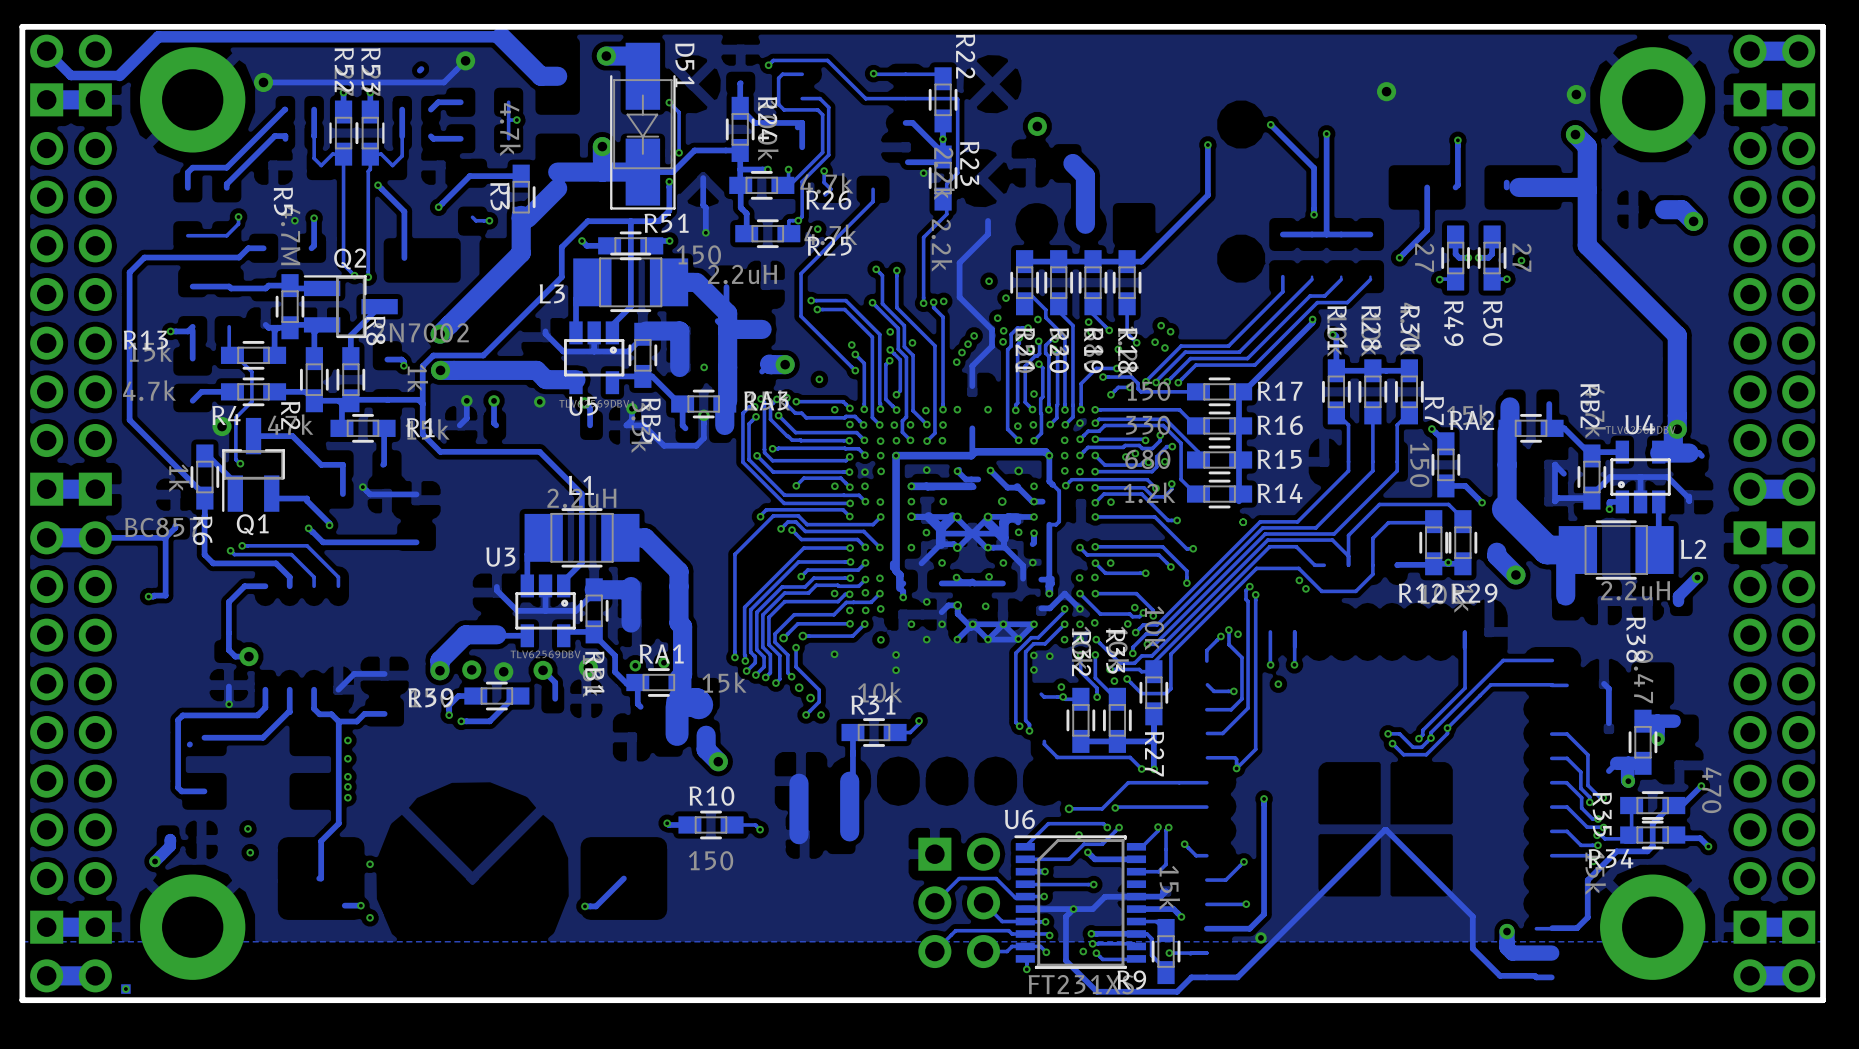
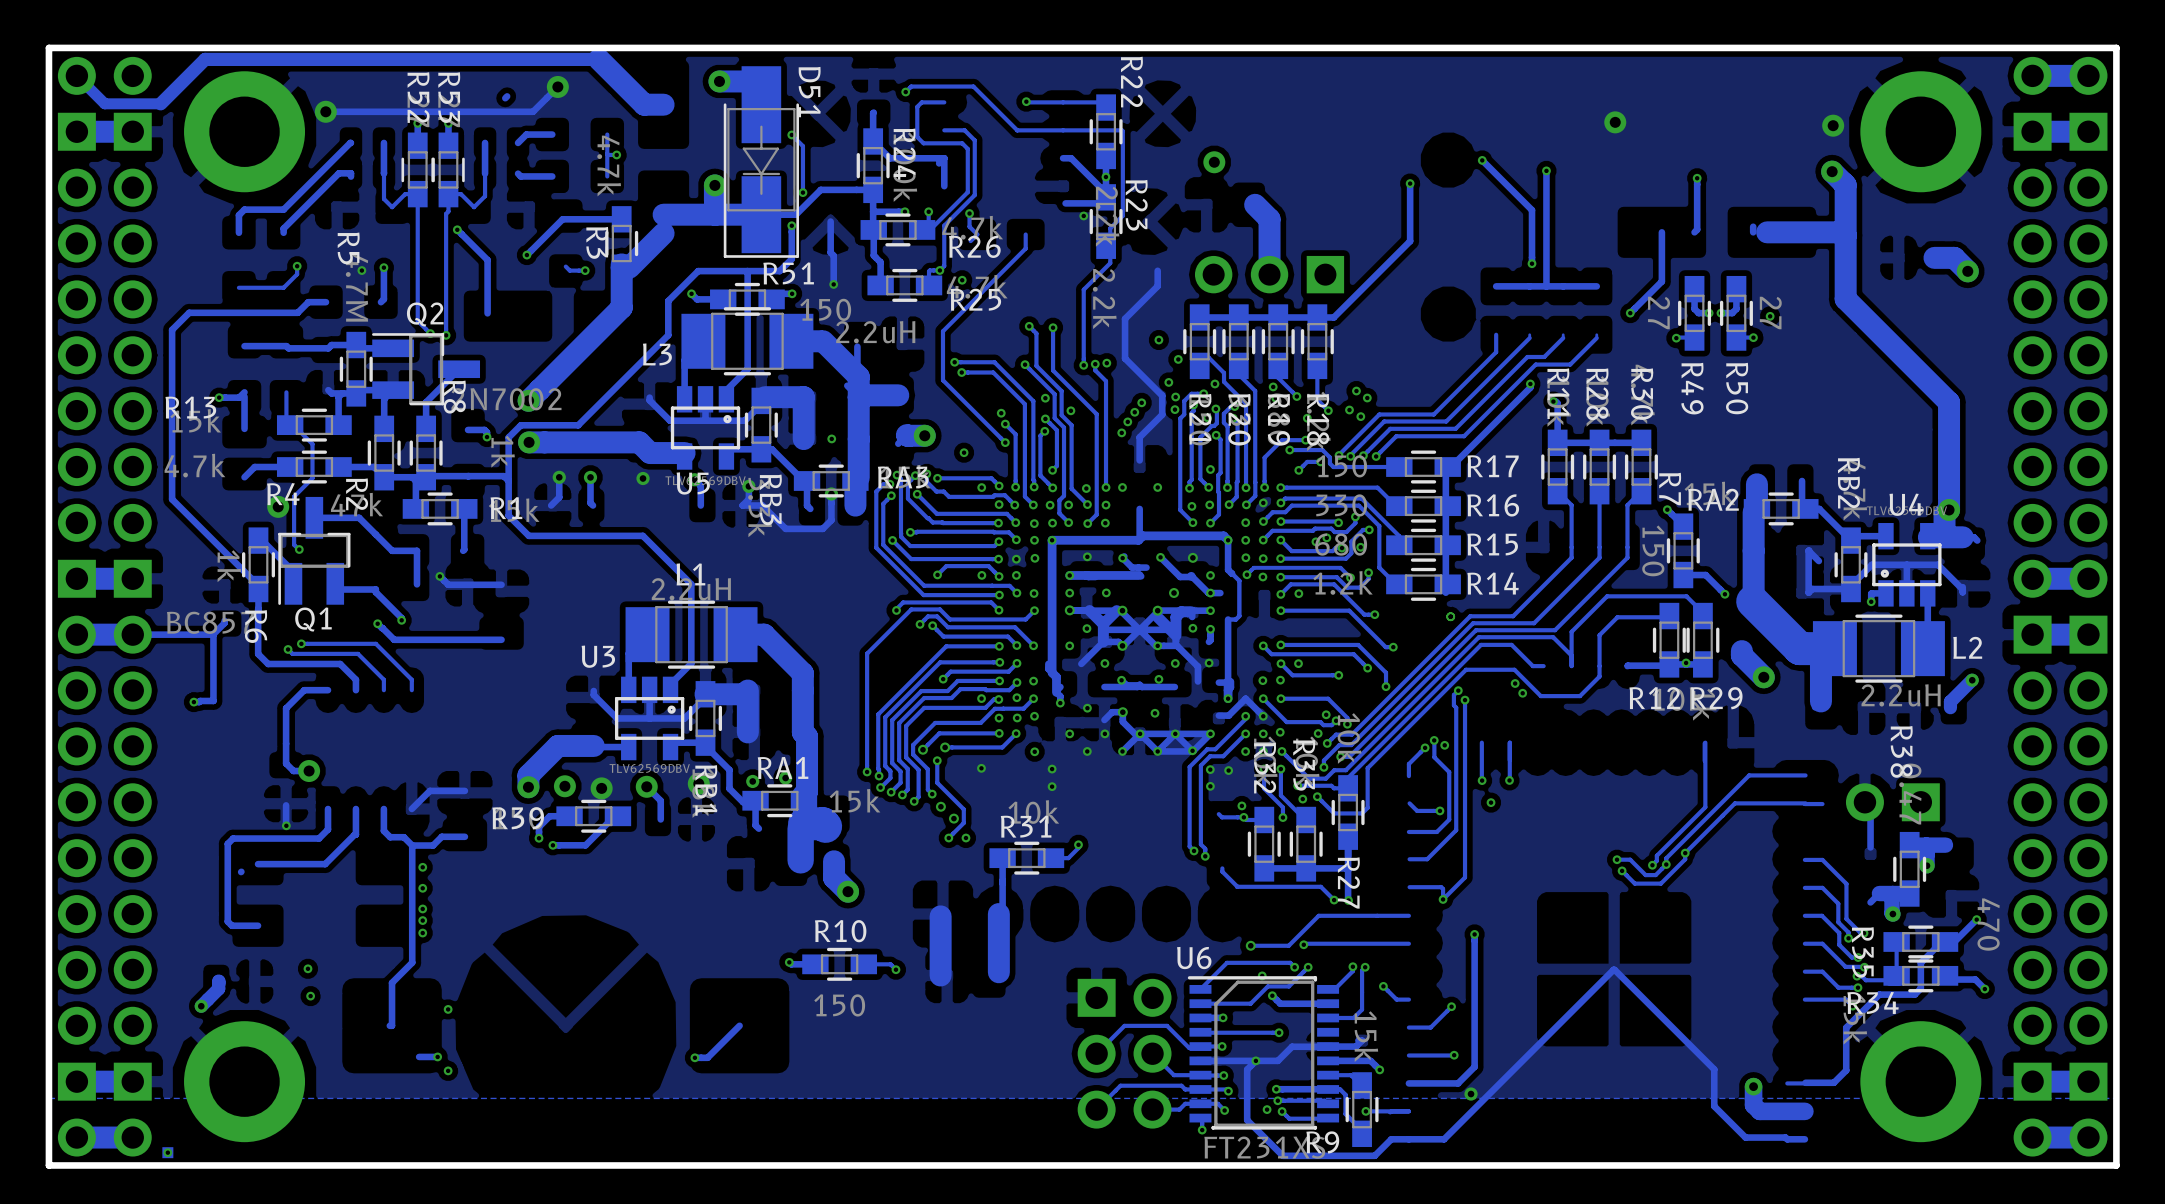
part: none -> (1269, 274)
part: none -> (1892, 802)

